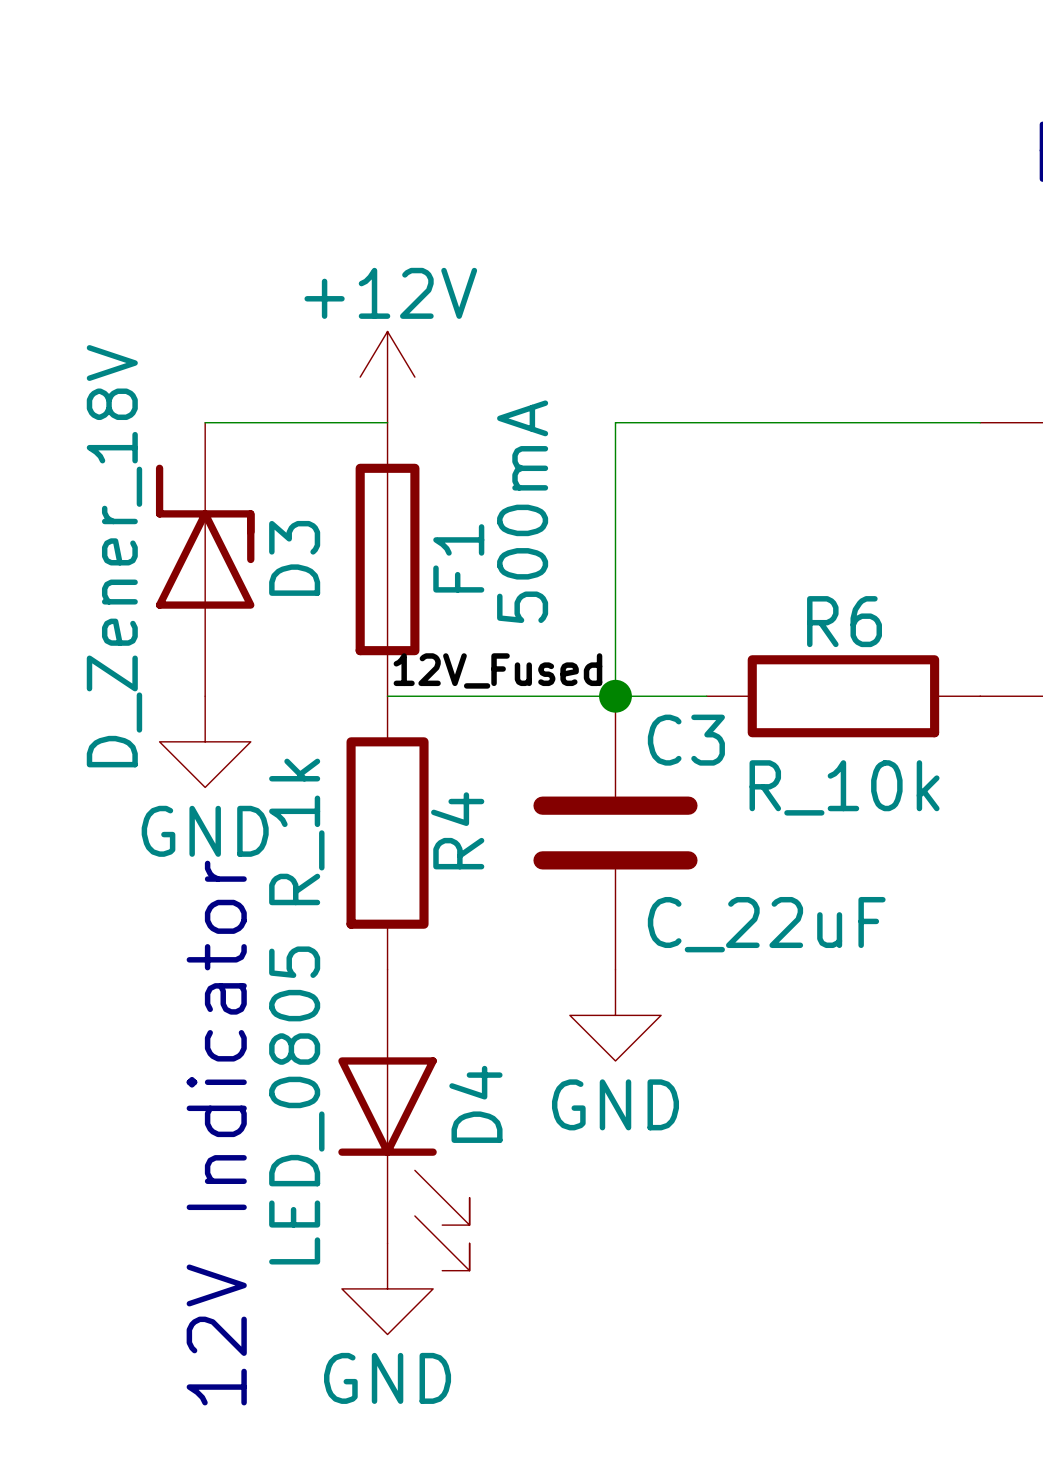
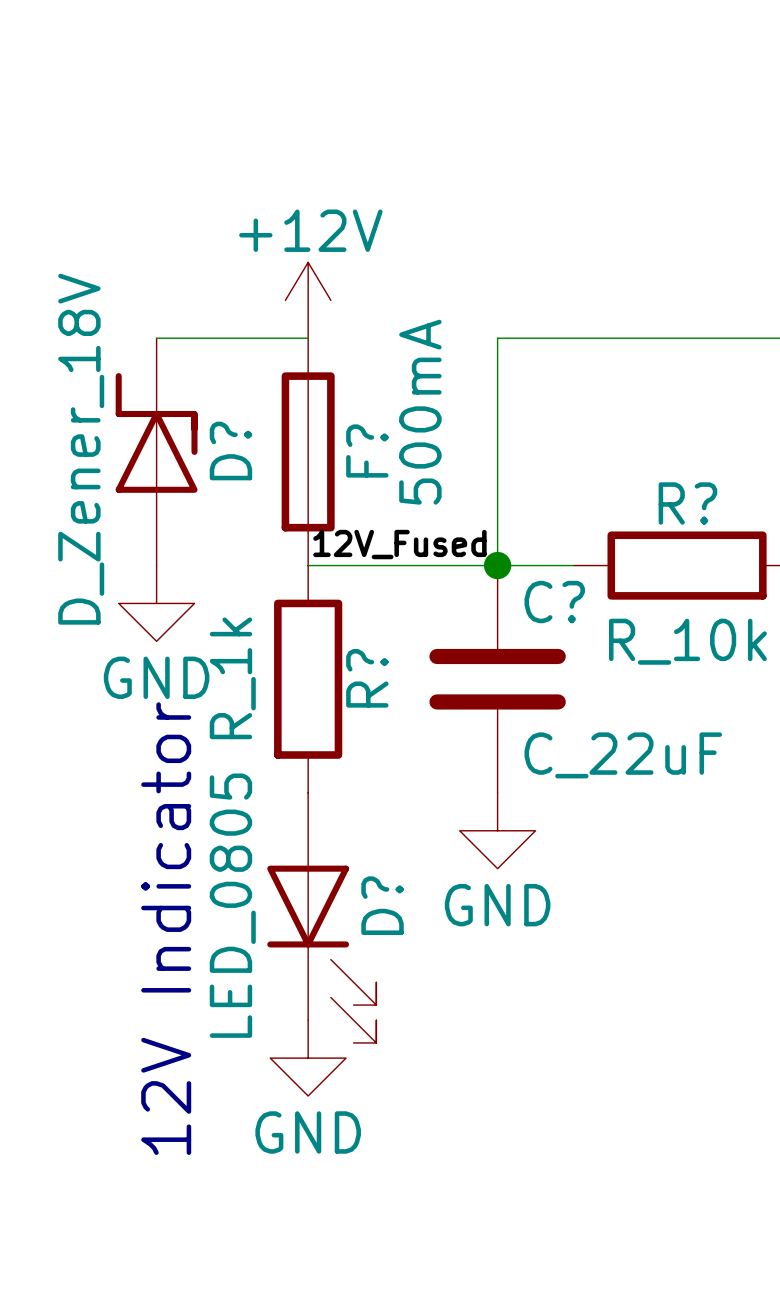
D3 name: D3 (294, 558) -> D? (230, 450)
F1 name: F1 (458, 558) -> F? (367, 450)
R6 name: R6 (844, 621) -> R? (687, 503)
C3 name: C3 (686, 740) -> C? (554, 602)
R4 name: R4 (457, 830) -> R? (367, 678)
D4 name: D4 (475, 1104) -> D? (382, 905)

